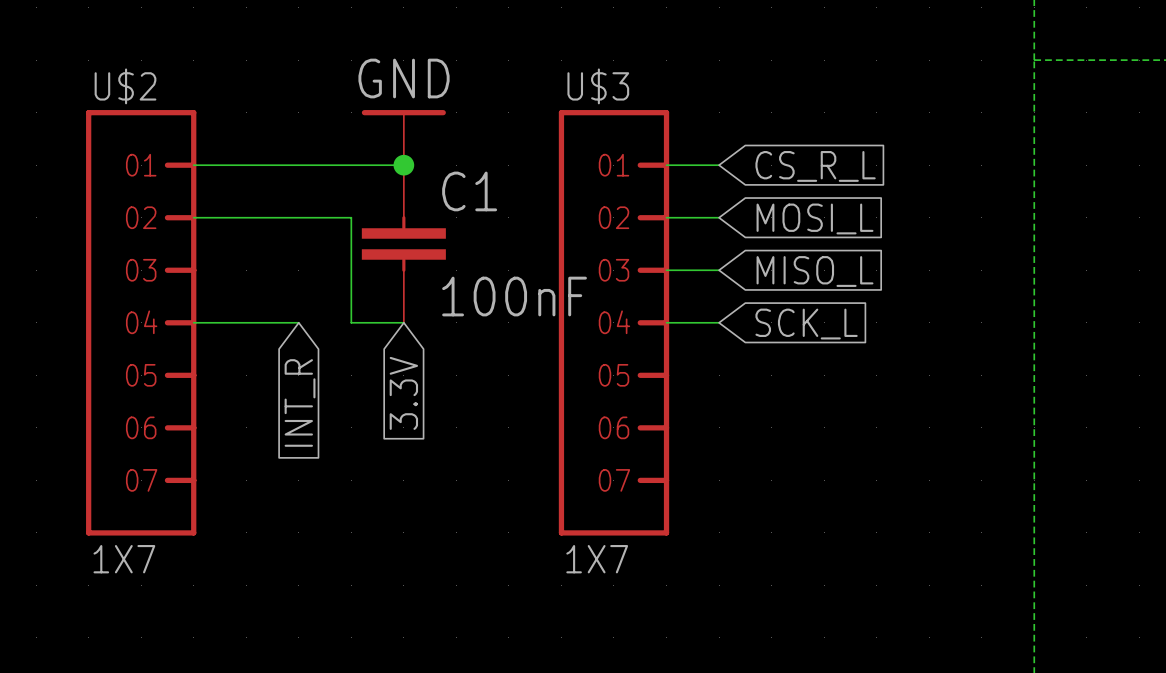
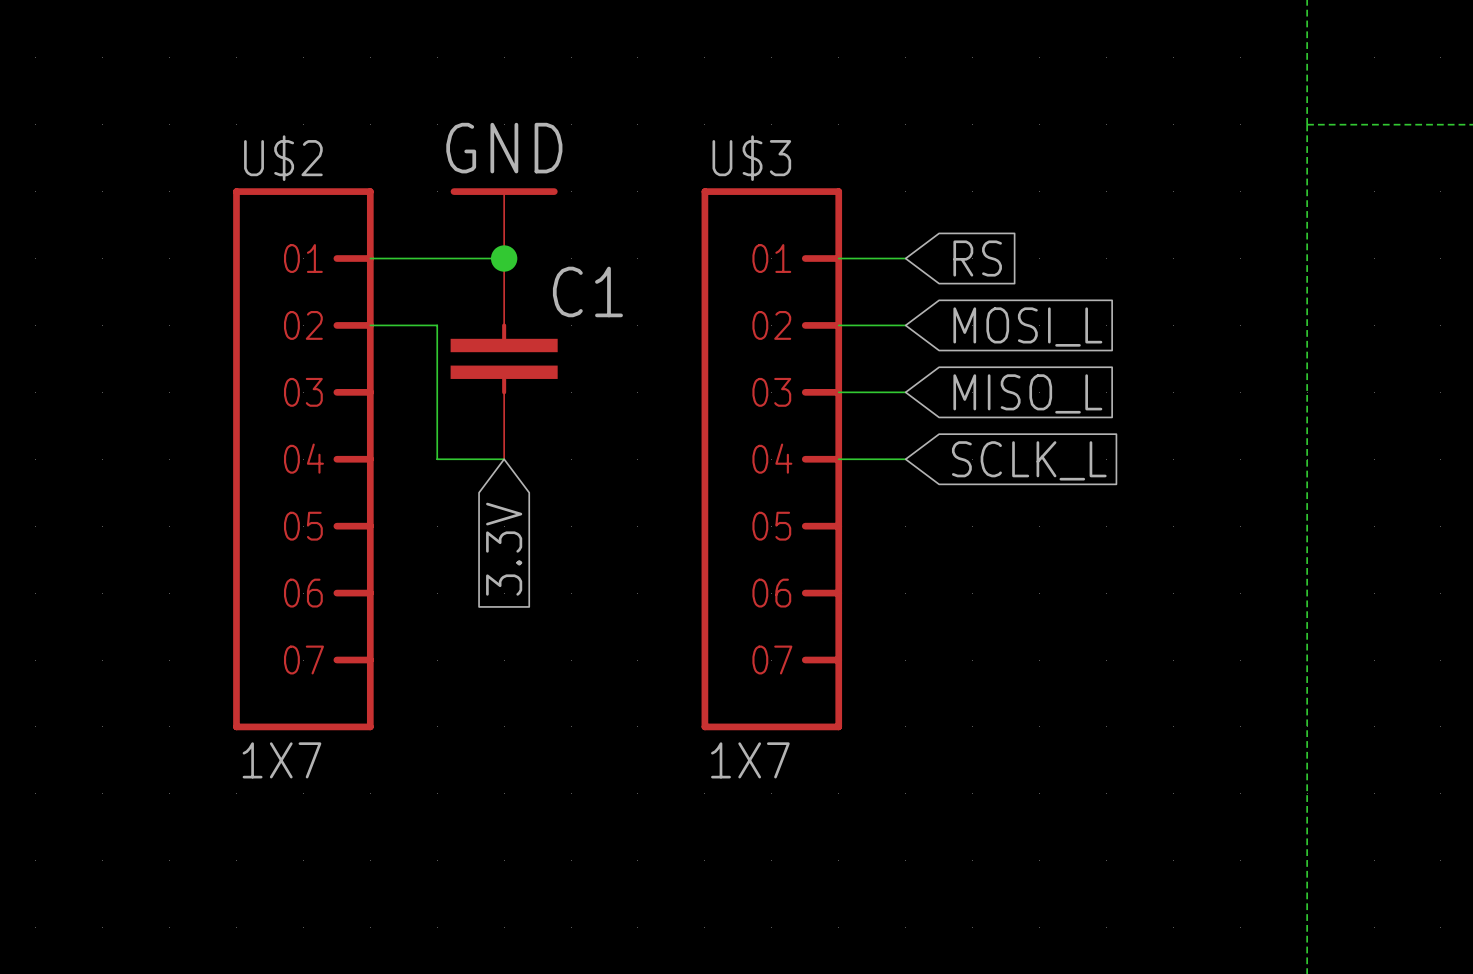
wire: (193, 165) (298, 165) -> none
global label: CS_R_L (815, 166) -> RS (977, 258)
wire: (193, 217) (298, 217) -> none
C1 value: 100nF (514, 296) -> none
U$2 position: (141, 322) -> (303, 459)
wire: (193, 322) (298, 322) -> none
global label: SCK_L (806, 324) -> SCLK_L (1029, 460)
global label: INT_R (300, 402) -> none

